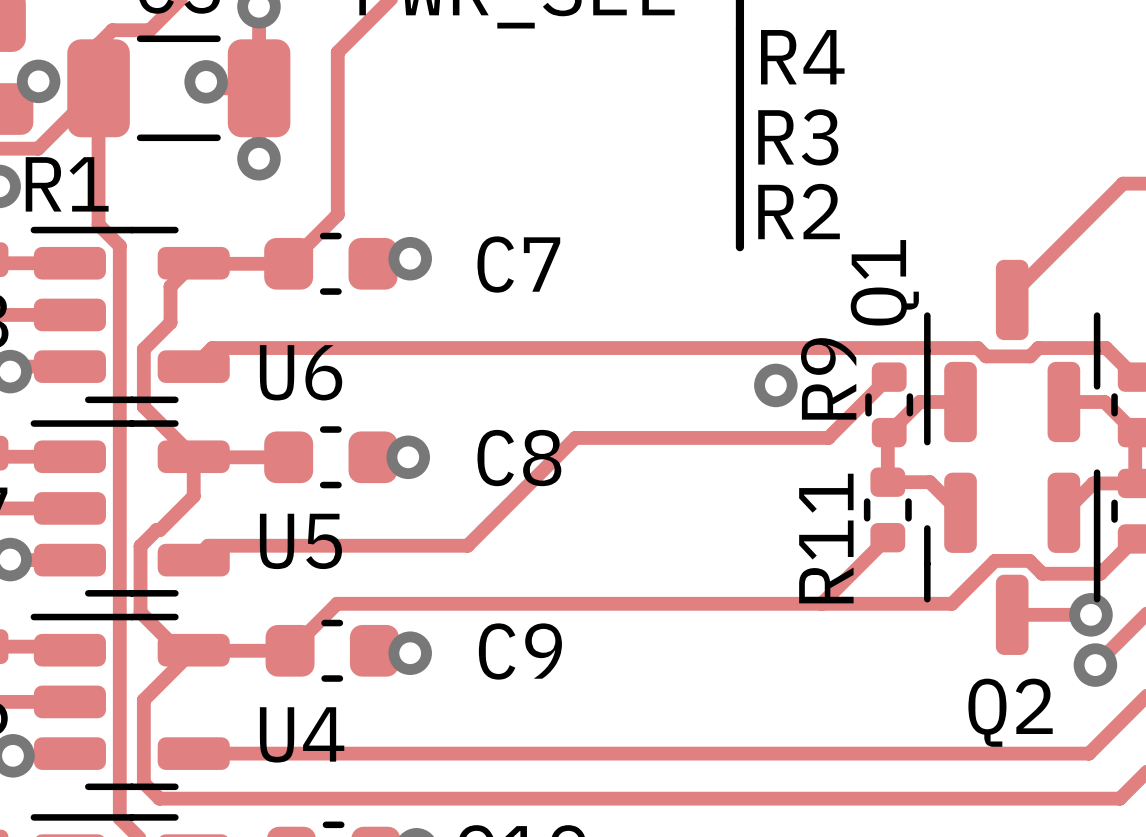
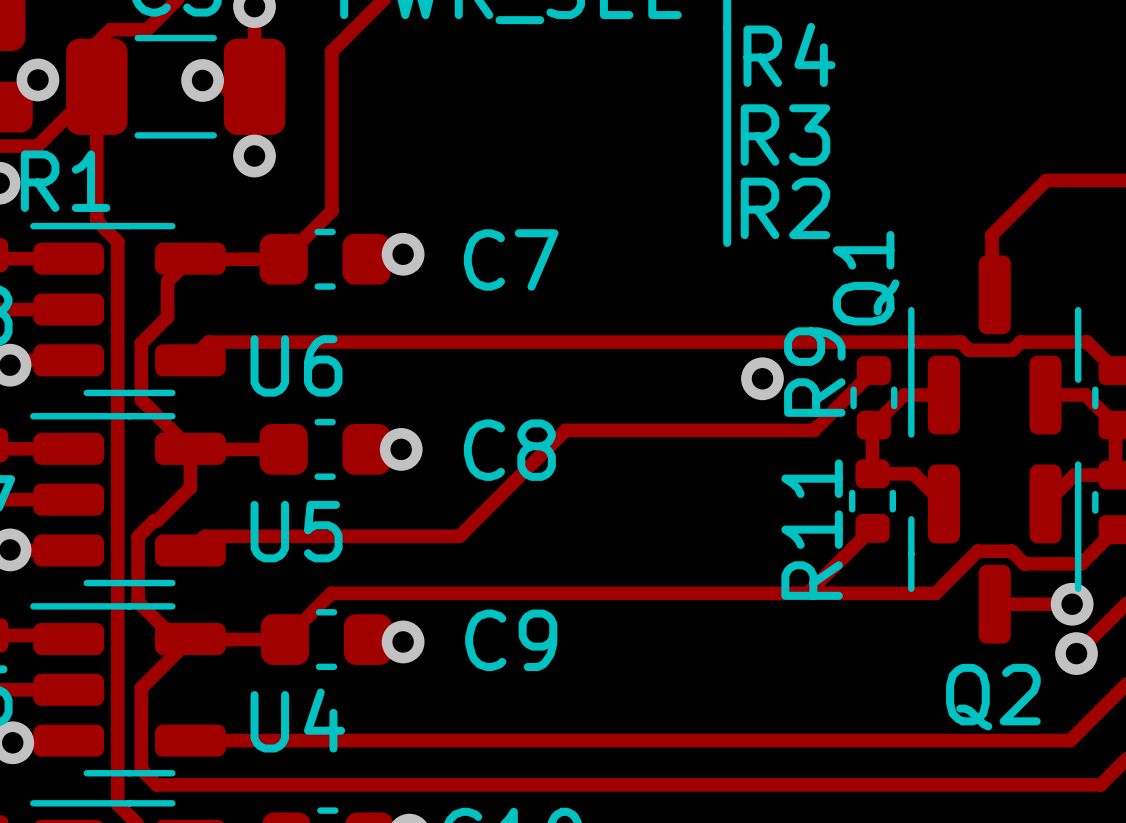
track: (1123, 183) (1009, 297) -> (1103, 180) (1046, 180) (992, 234) (992, 292)

